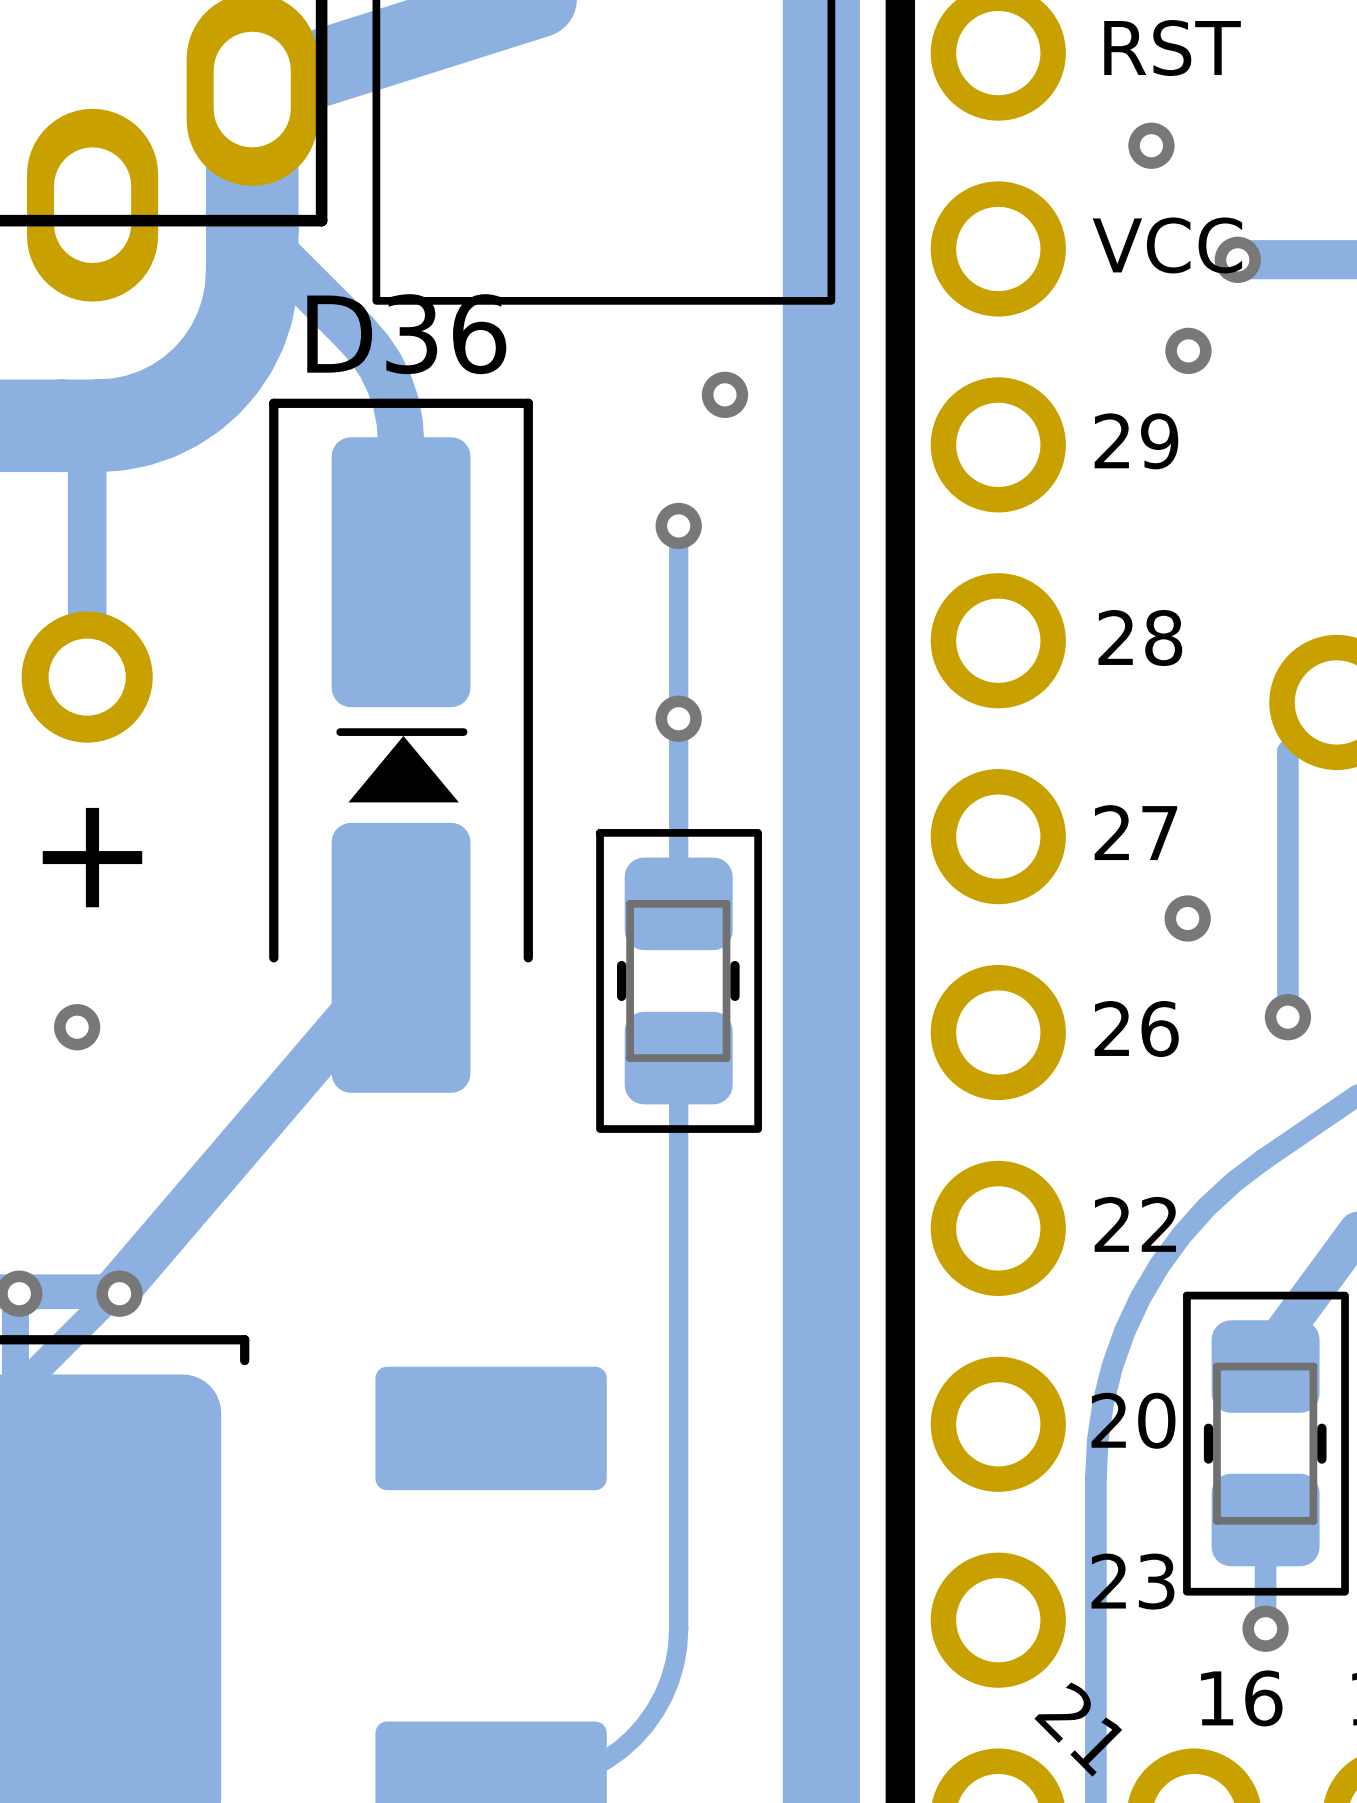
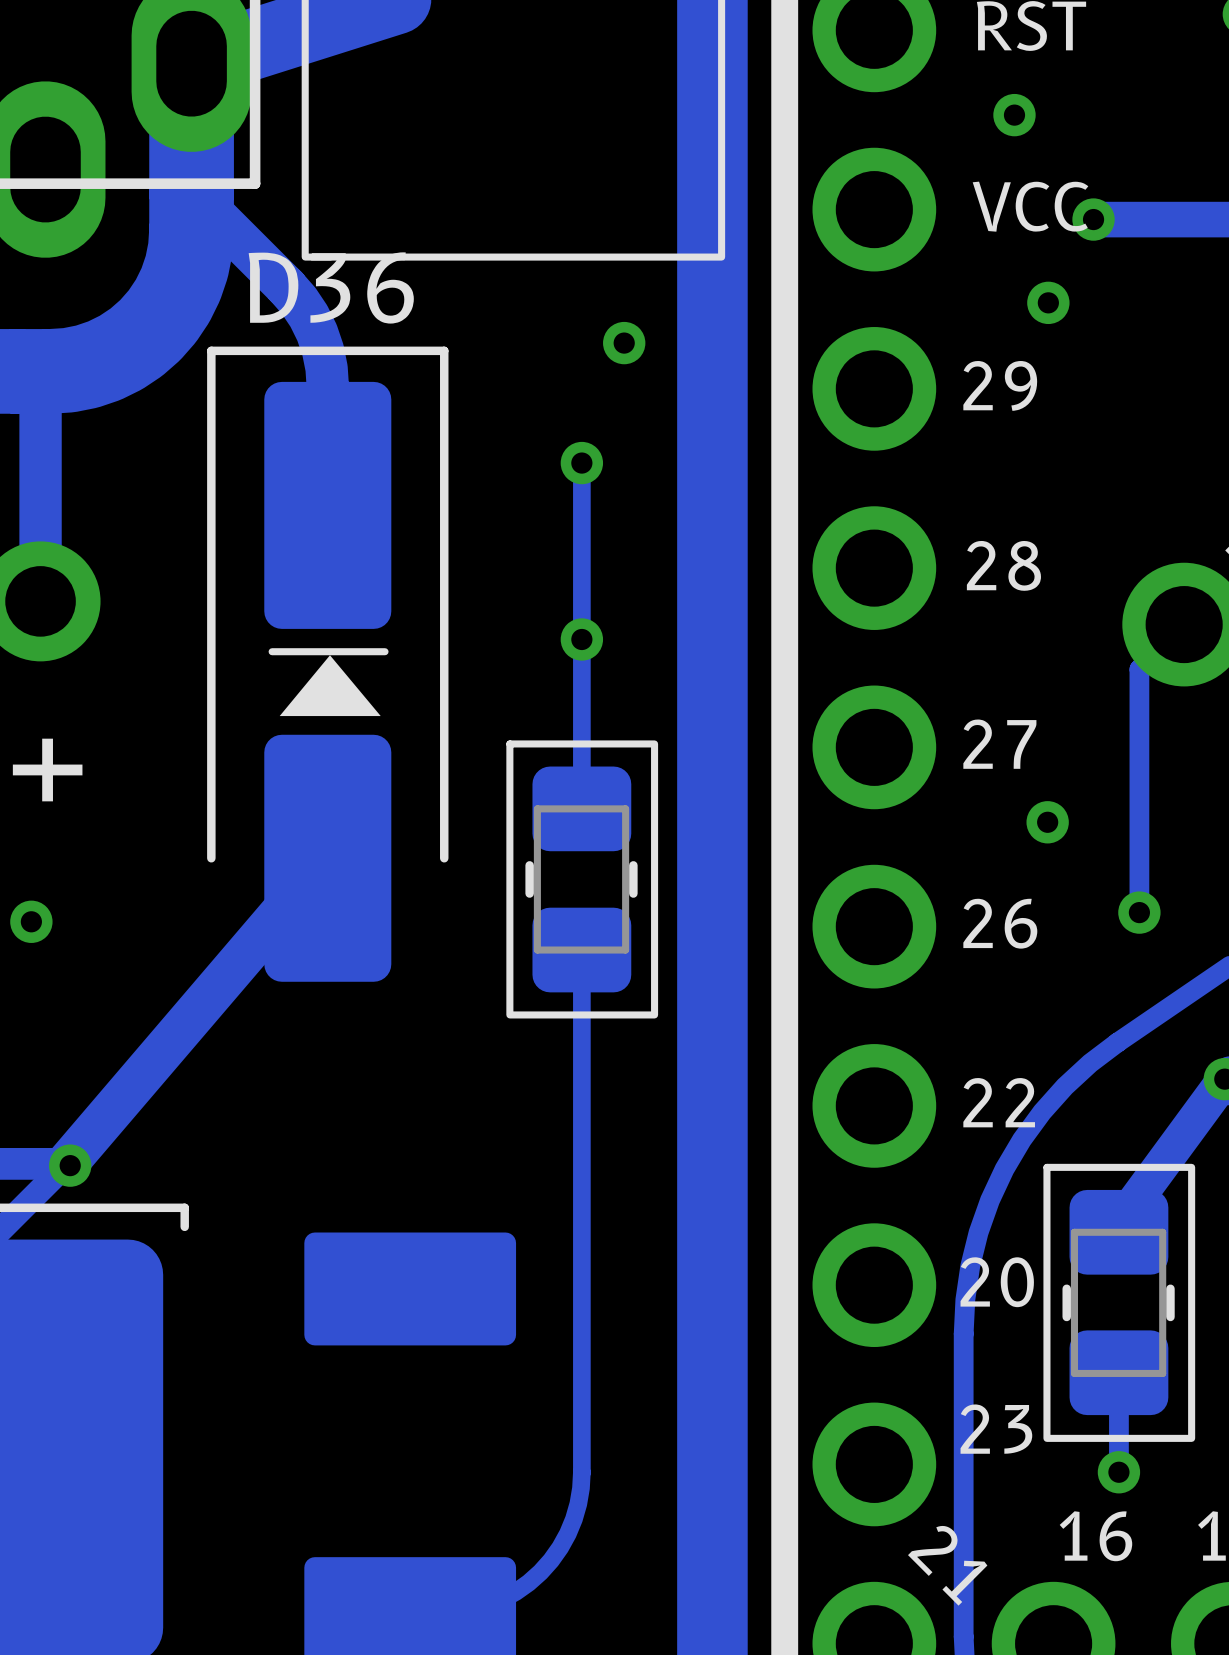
track width: thin (87, 451) (87, 677) -> thick (40, 394) (40, 601)

